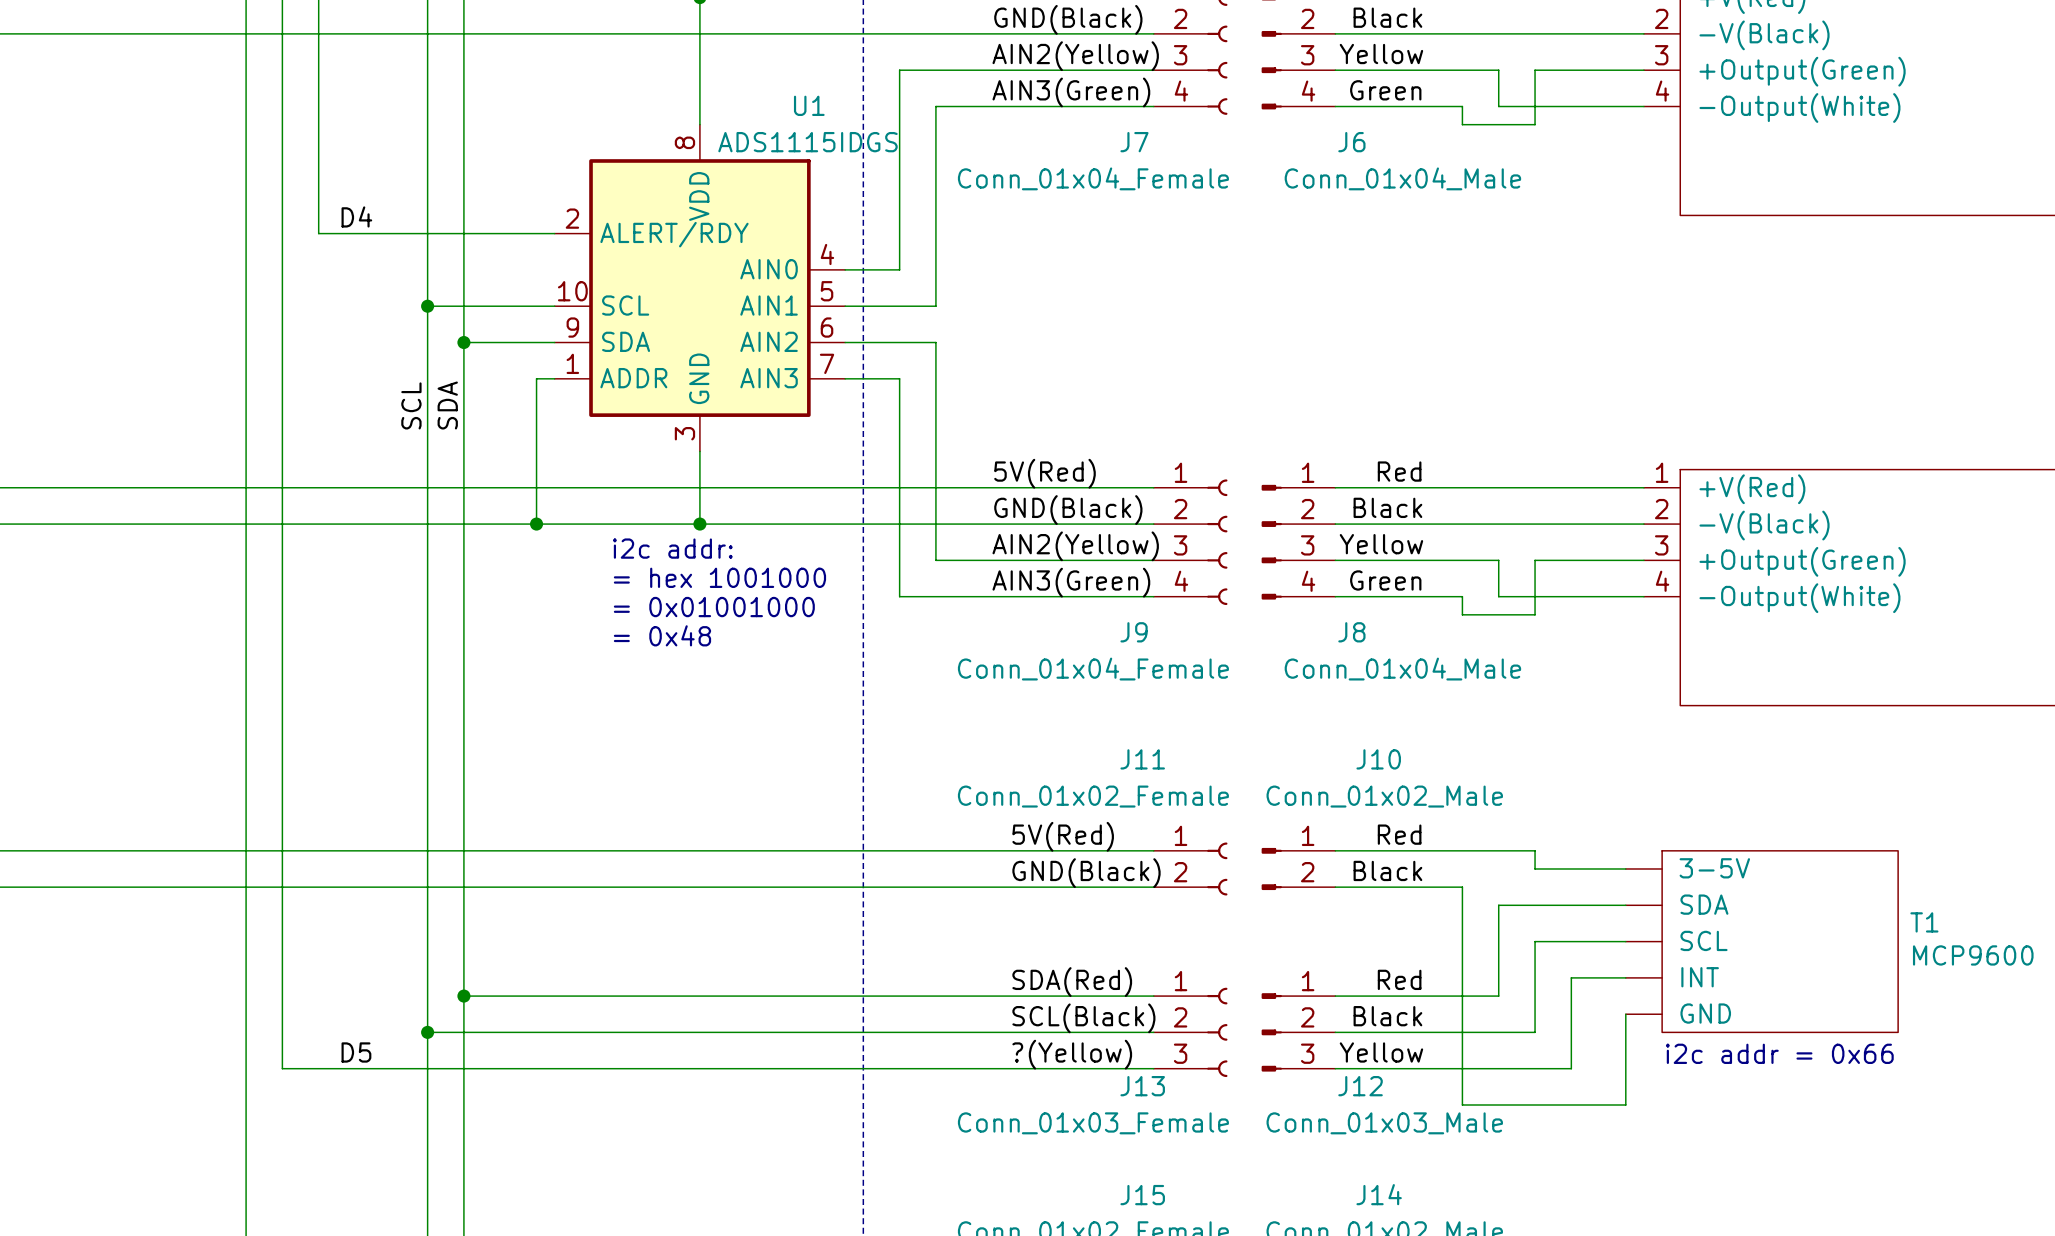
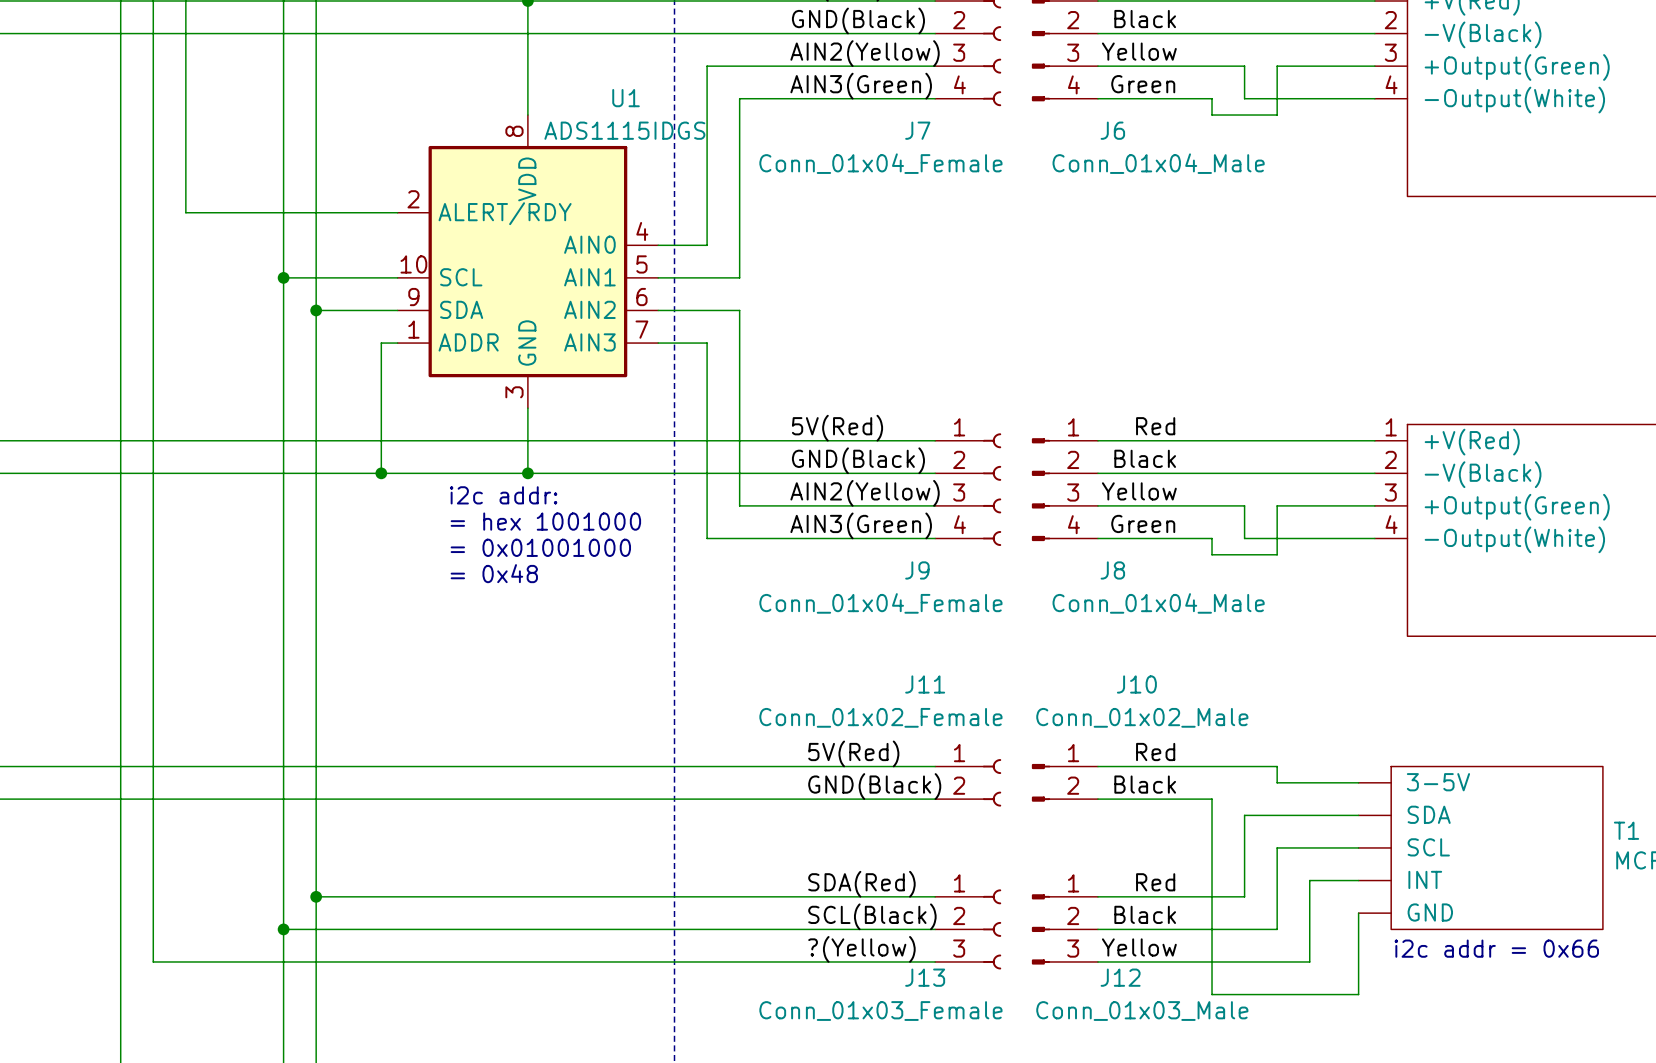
label: D4 (356, 216) -> none
label: SCL (411, 405) -> none
label: SDA (447, 405) -> none
label: D5 (356, 1052) -> none

